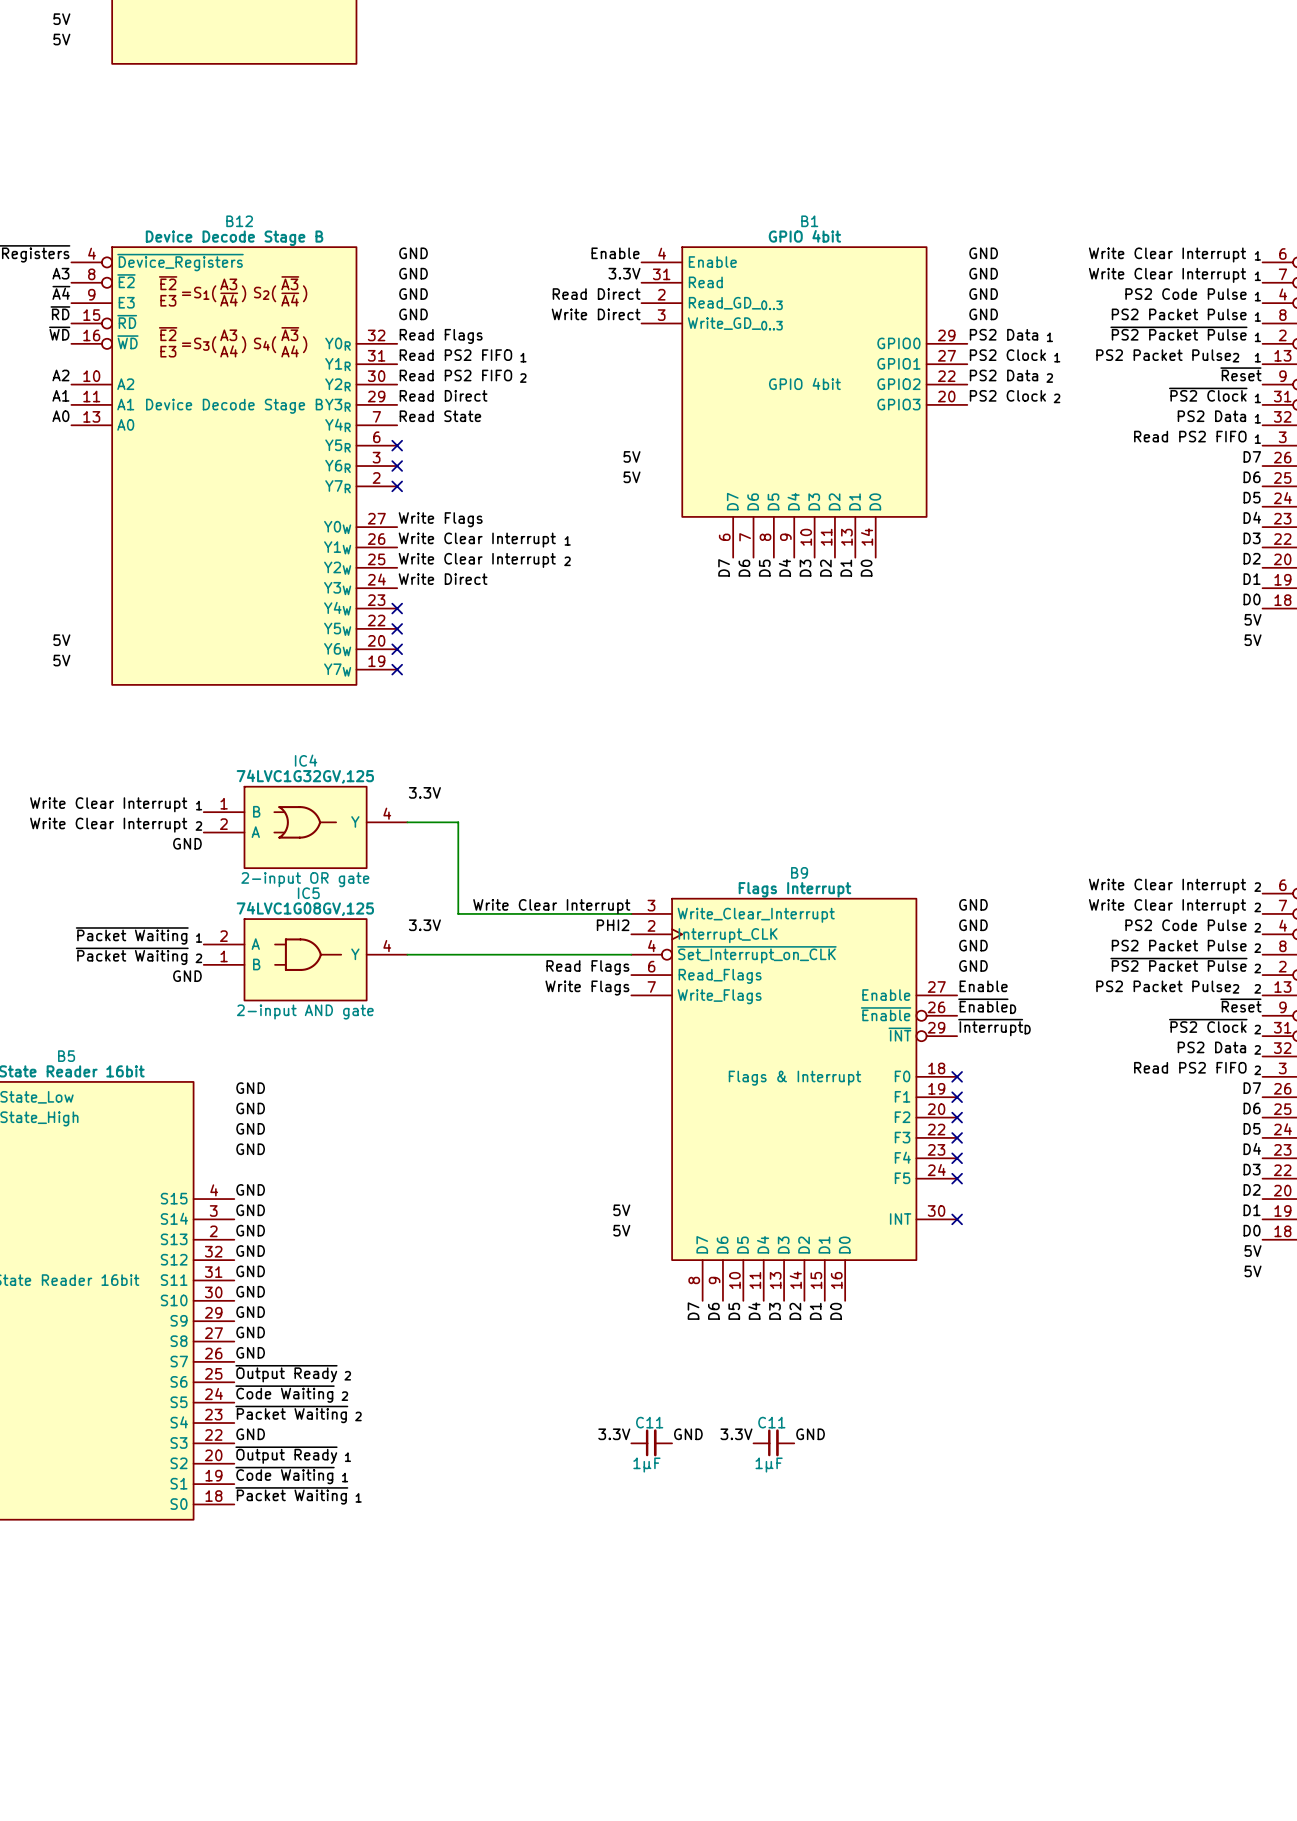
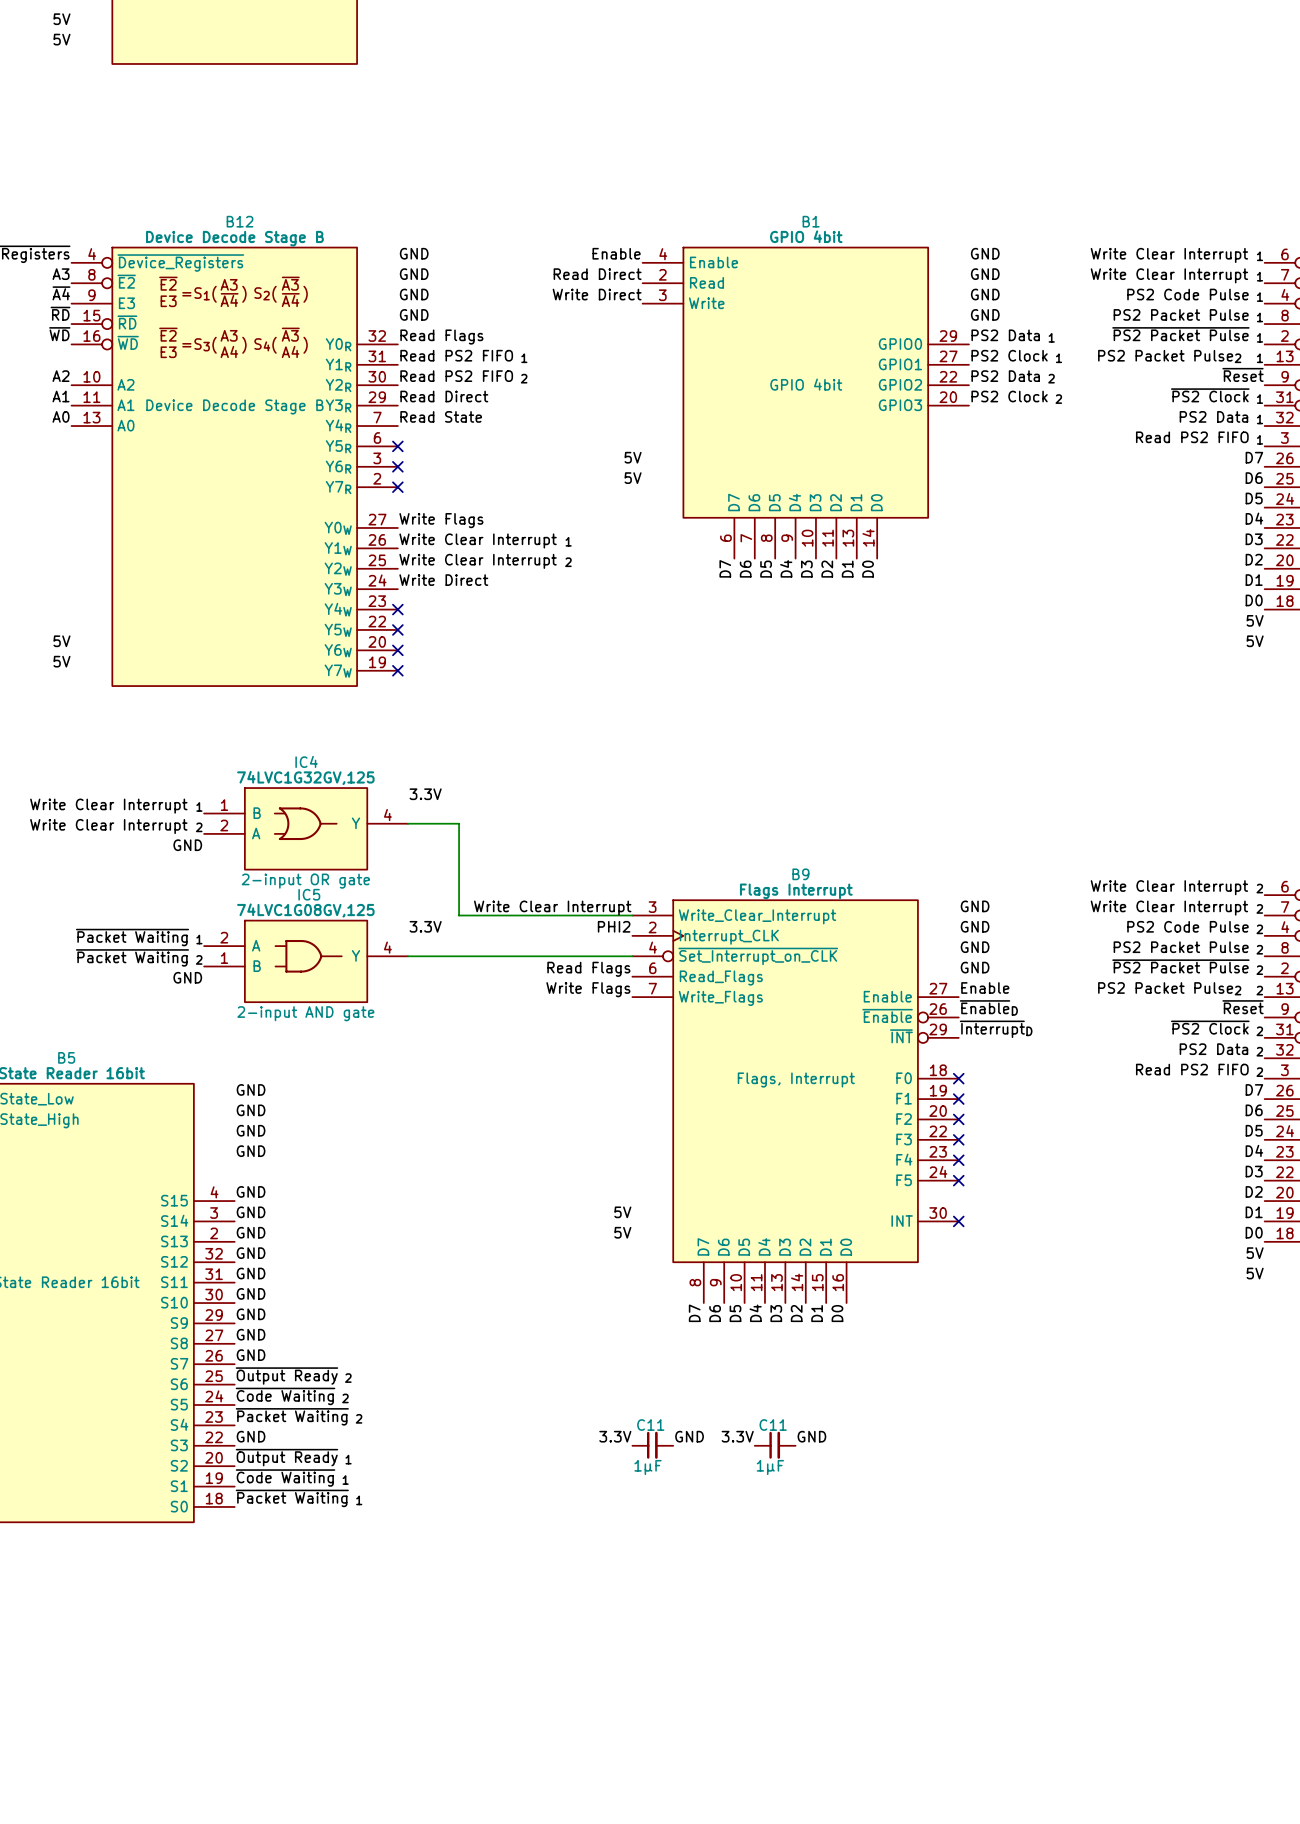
B1 symbol: [641, 246, 968, 558] -> [642, 246, 969, 559]
label: 3.3V (624, 273) -> Read Direct (597, 274)
label: Read Direct (596, 294) -> Write Direct (597, 294)
label: Write Direct (596, 314) -> none
B9 text: Flags & Interrupt (794, 1078) -> Flags, Interrupt (796, 1079)

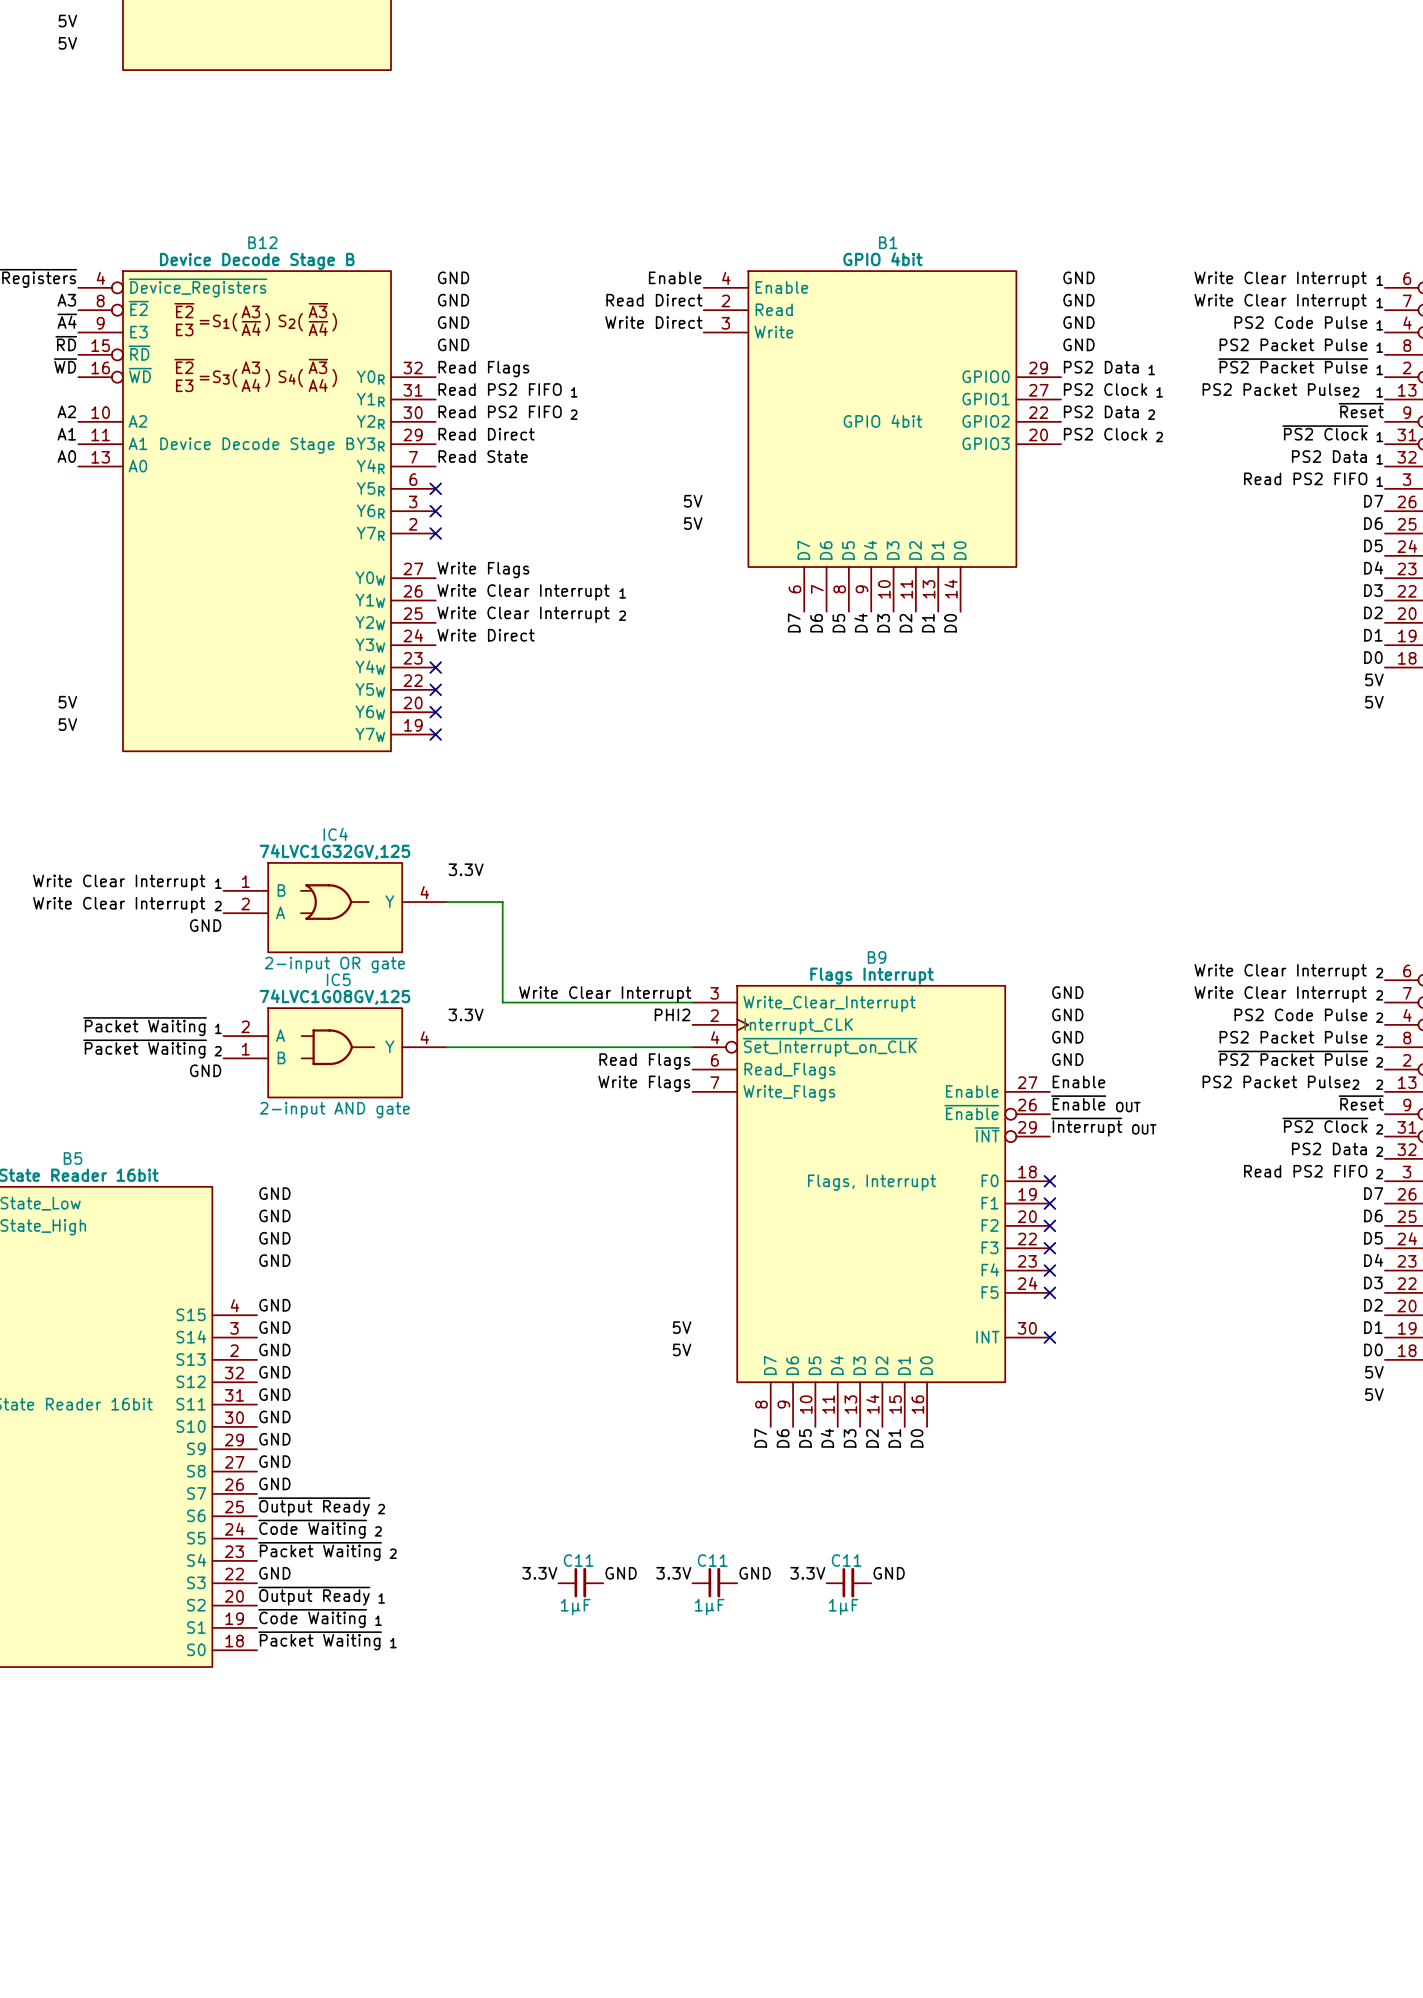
label: ~{Enable}D (988, 1007) -> ~{Enable} OUT (1095, 1103)
label: ~{Interrupt}D (996, 1029) -> ~{Interrupt} OUT (1103, 1127)
label: none -> 3.3V (539, 1573)
label: none -> GND (621, 1573)
C11: none -> 1µF (580, 1582)

